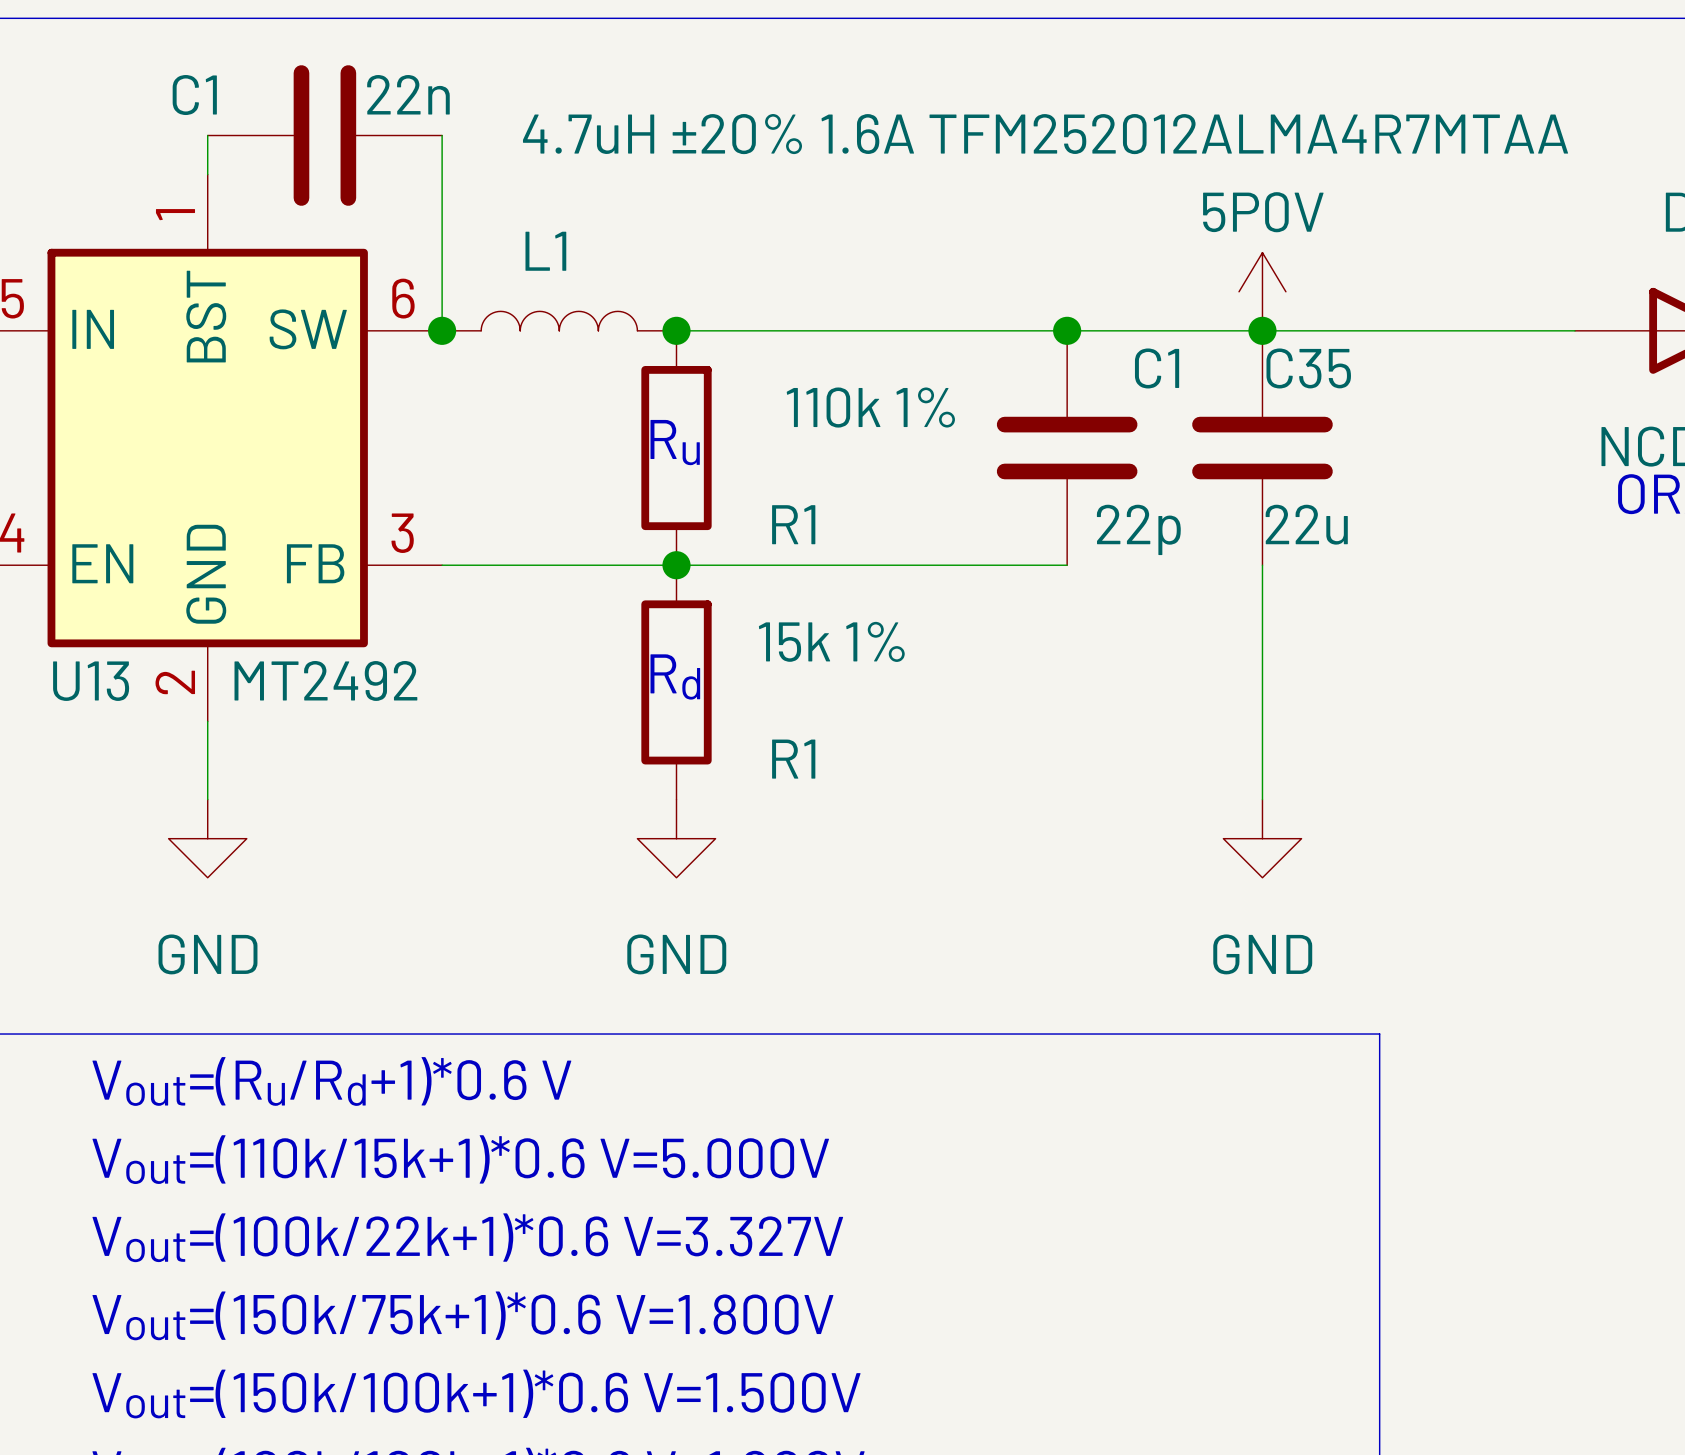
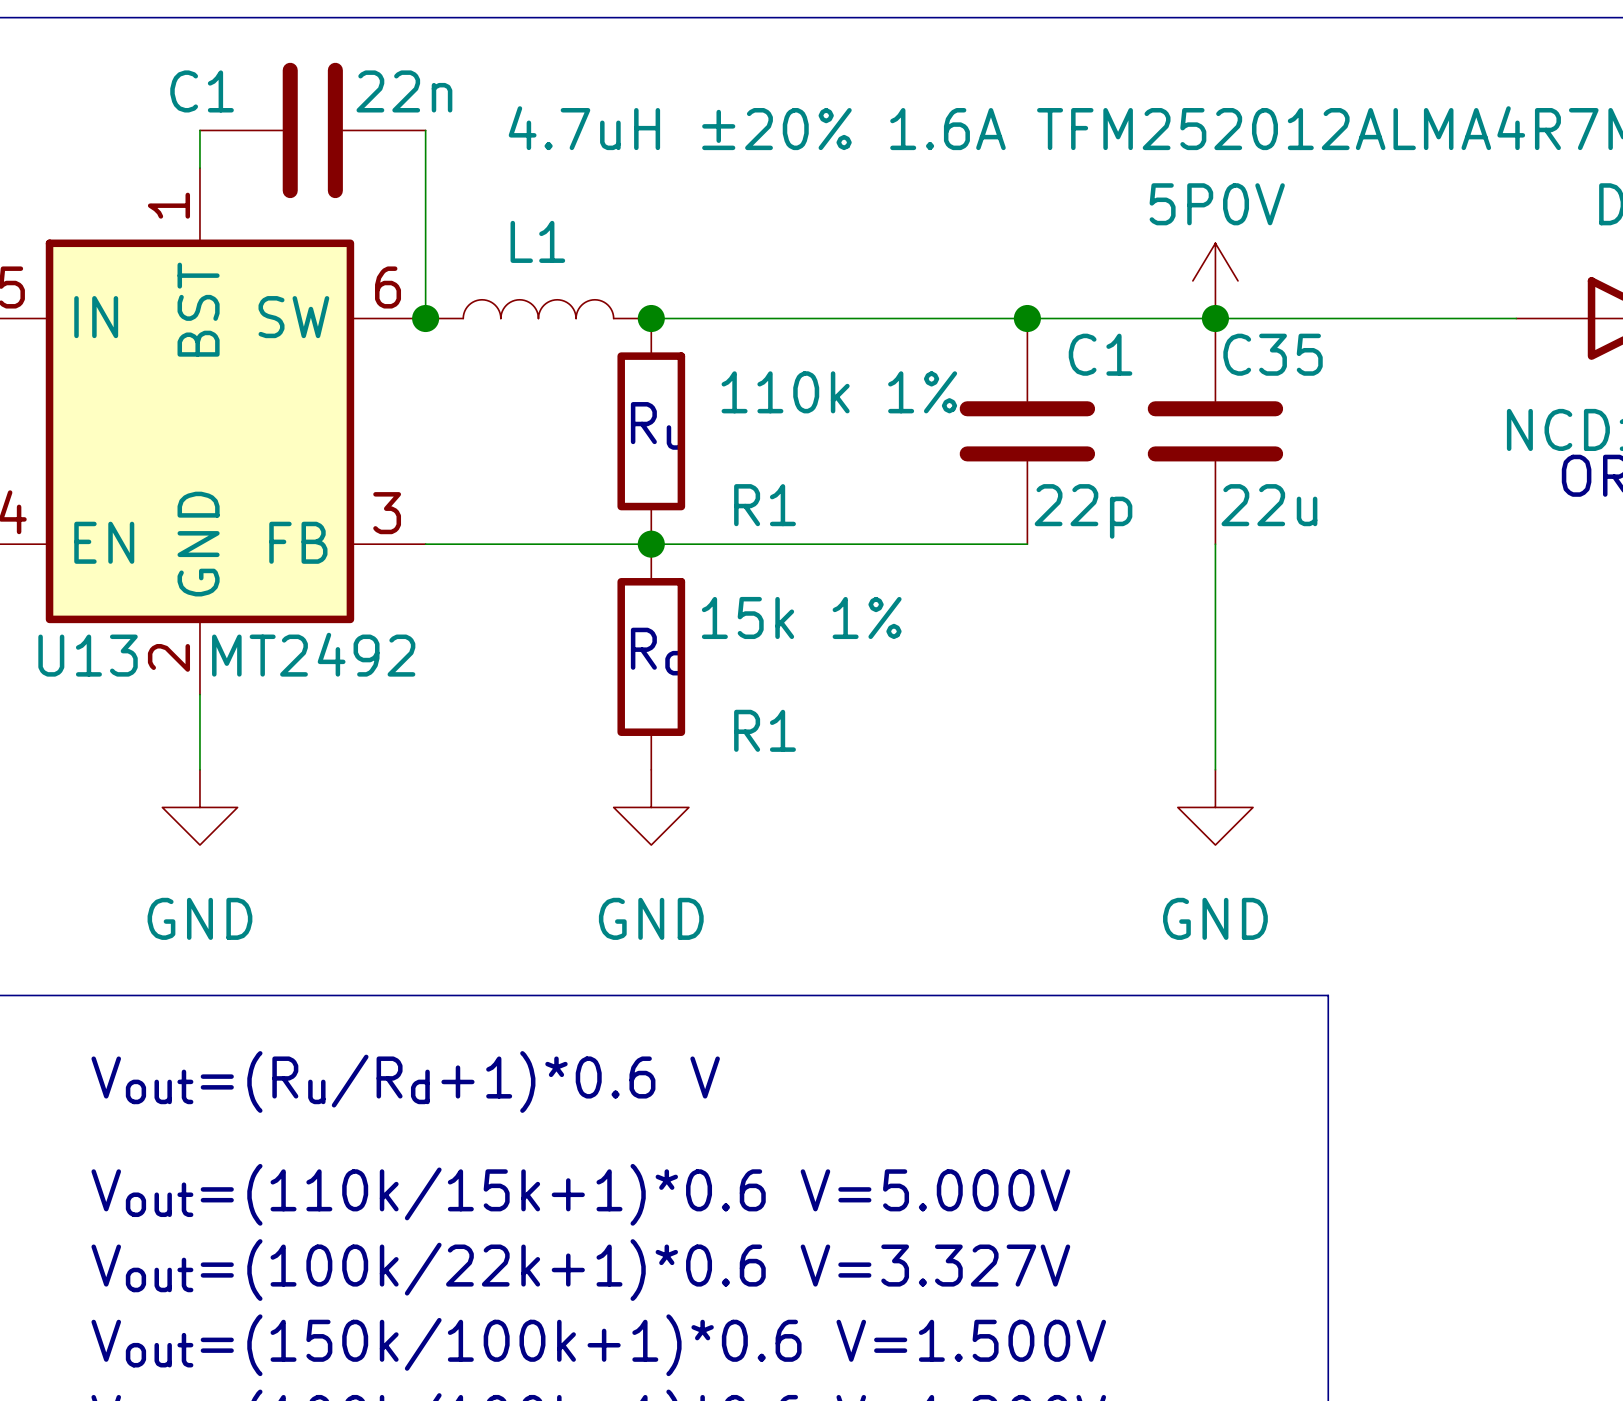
text position: Vout=(Ru/Rd+1)*0.6 V (331, 1081) -> Vout=(Ru/Rd+1)*0.6 V (405, 1081)
text: Vout=(110k/15k+1)*0.6 V=5.000V (460, 1159) -> none
text: Vout=(100k/22k+1)*0.6 V=3.327V (467, 1237) -> Vout=(110k/15k+1)*0.6 V=5.000V (580, 1194)
text: Vout=(150k/75k+1)*0.6 V=1.800V (463, 1315) -> Vout=(100k/22k+1)*0.6 V=3.327V (580, 1270)

